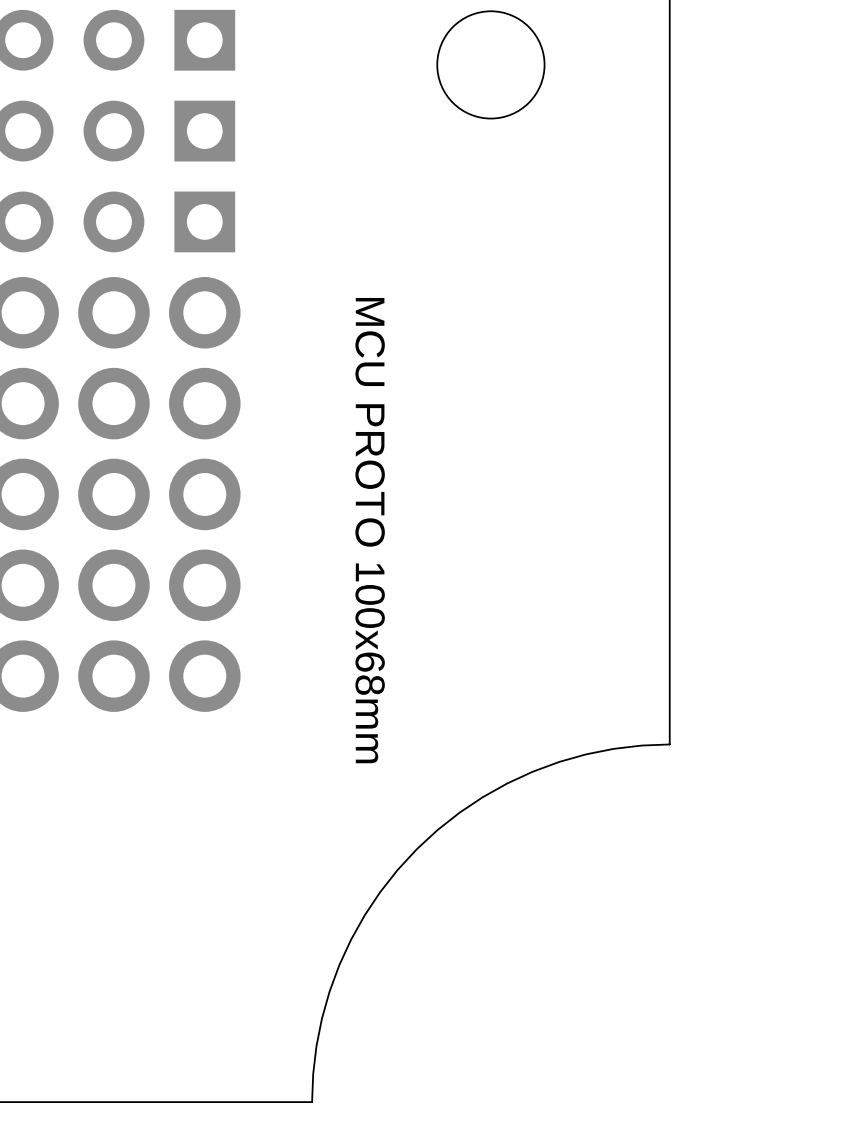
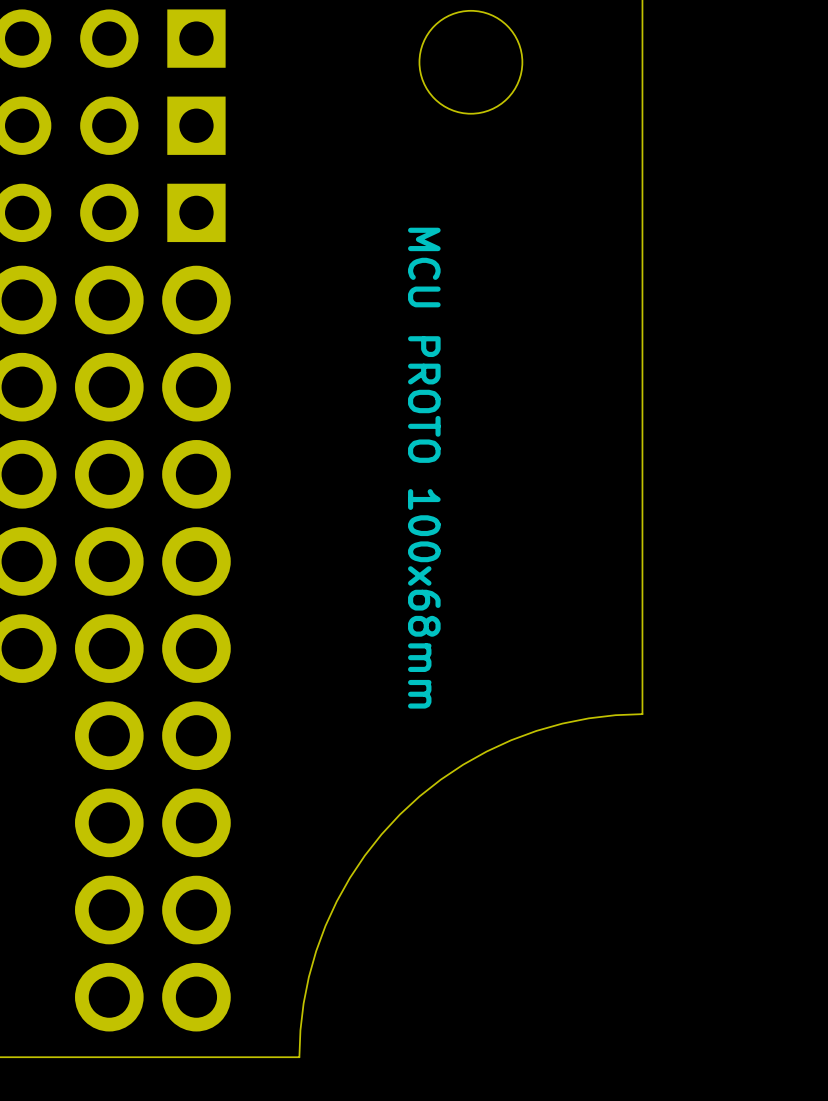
text position: MCU PROTO 100x68mm (370, 530) -> MCU PROTO 100x68mm (424, 468)
part: none -> (109, 735)
part: none -> (196, 735)
part: none -> (109, 822)
part: none -> (196, 822)
part: none -> (109, 910)
part: none -> (196, 910)
part: none -> (109, 997)
part: none -> (196, 997)

